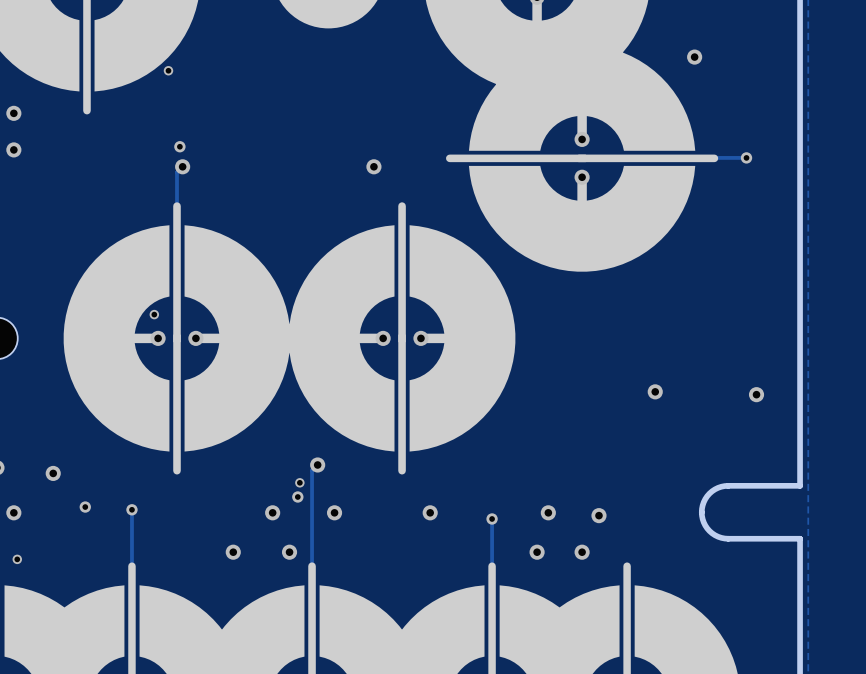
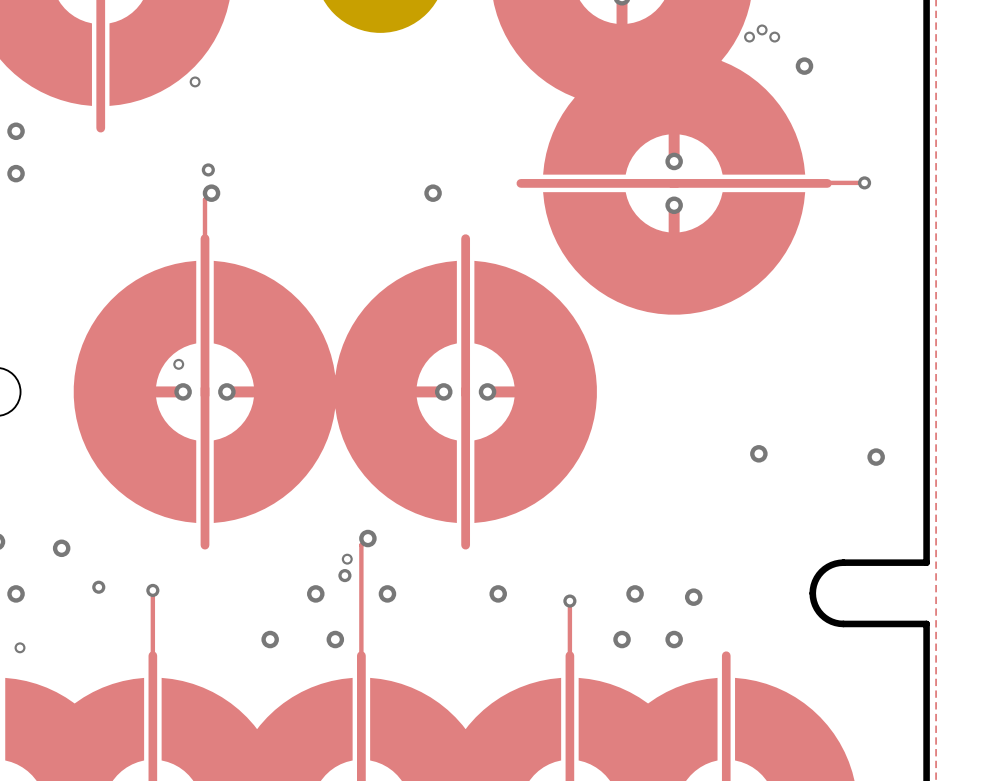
via: none -> (762, 29)
via: none -> (749, 37)
via: none -> (774, 37)

